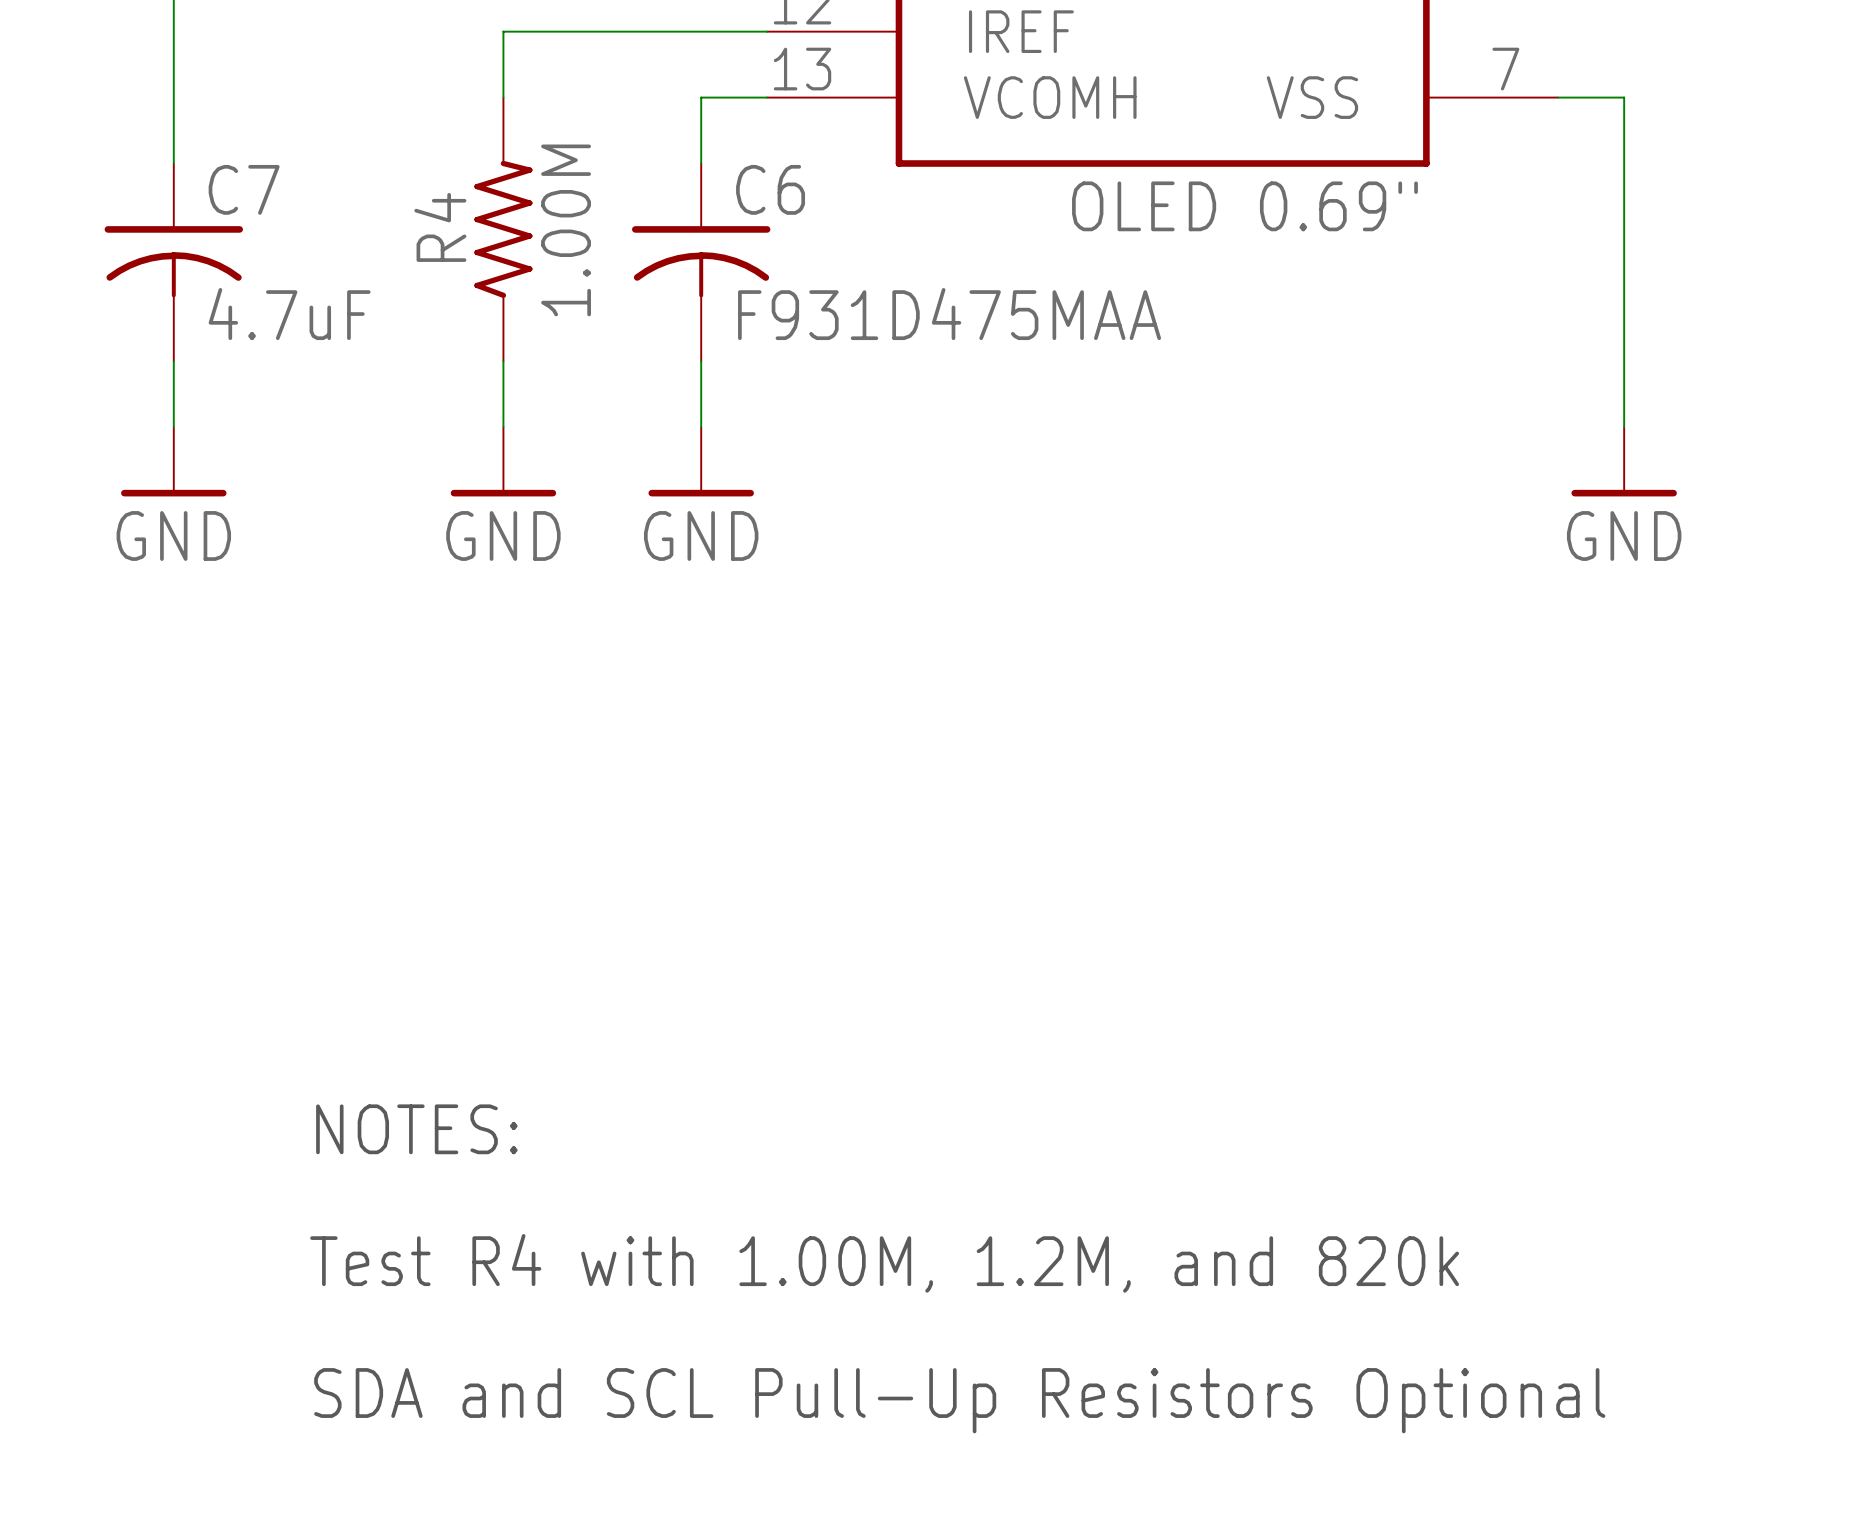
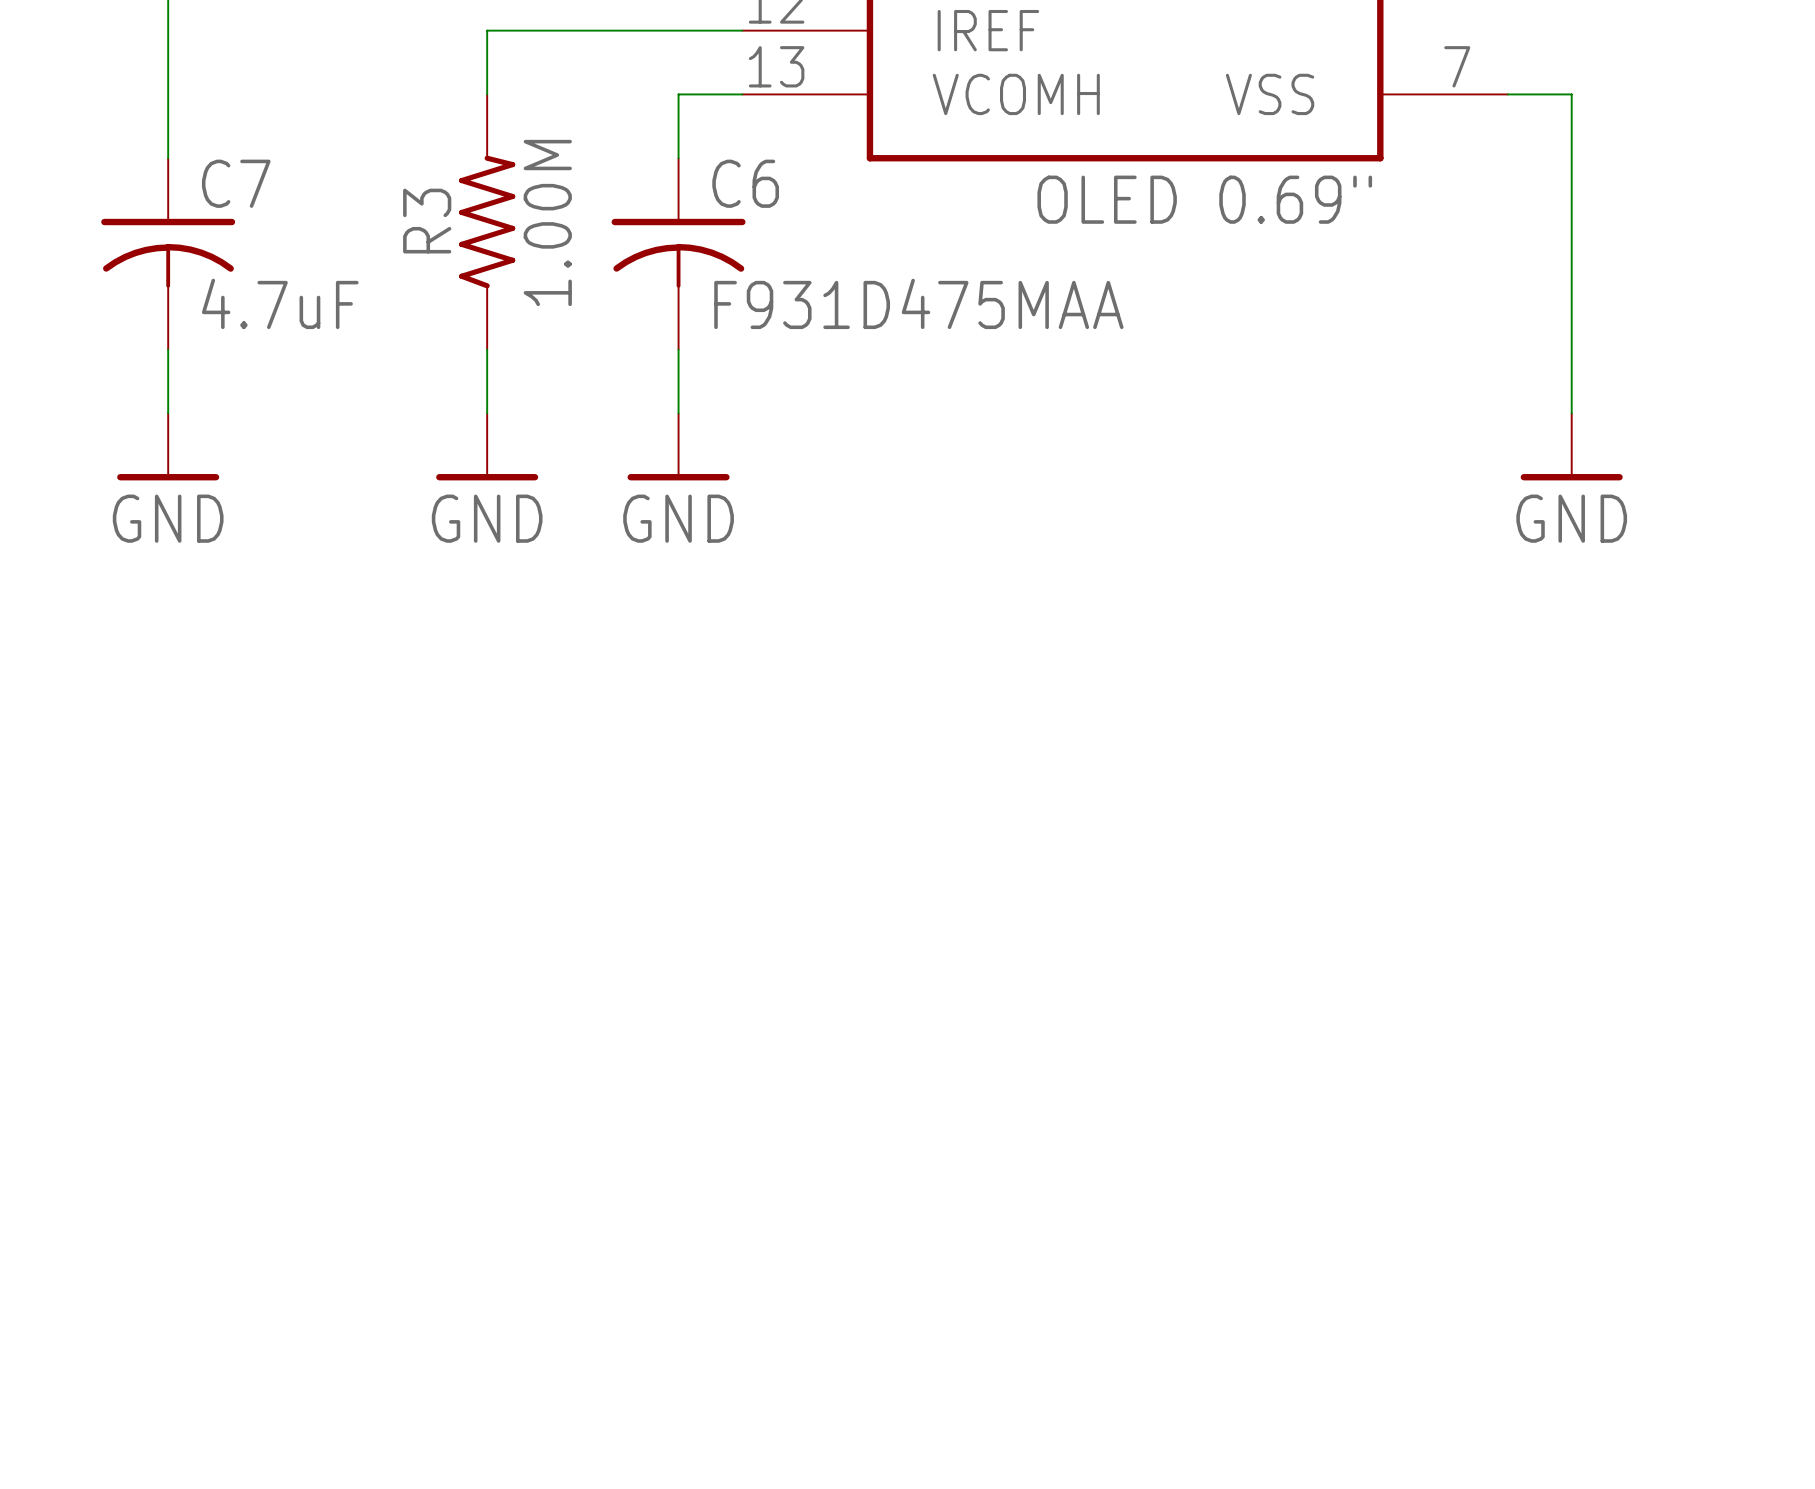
R4 name: R4 (440, 227) -> R3 (427, 221)
text: NOTES: (416, 1129) -> none
text: Test R4 with 1.00M, 1.2M, and 820k (884, 1263) -> none
text: SDA and SCL Pull-Up Resistors Optional (959, 1400) -> none

